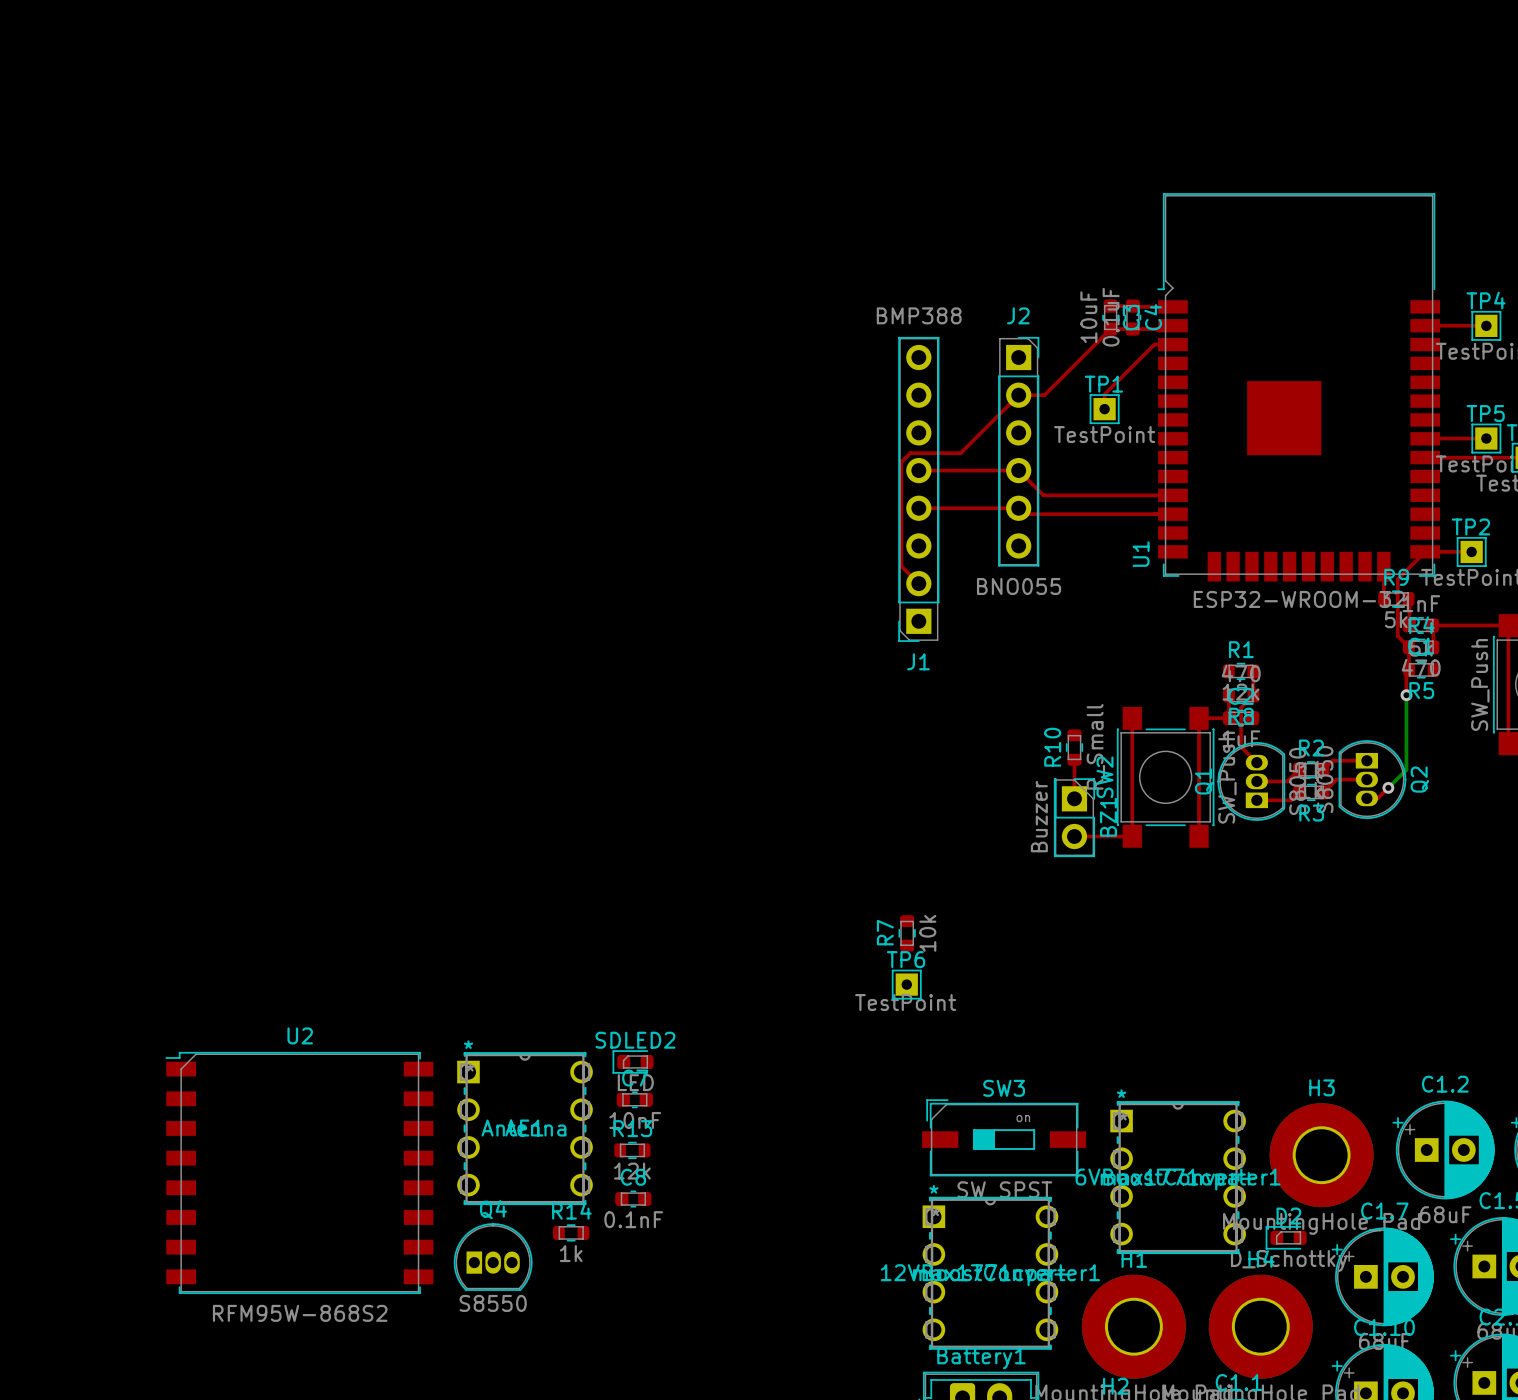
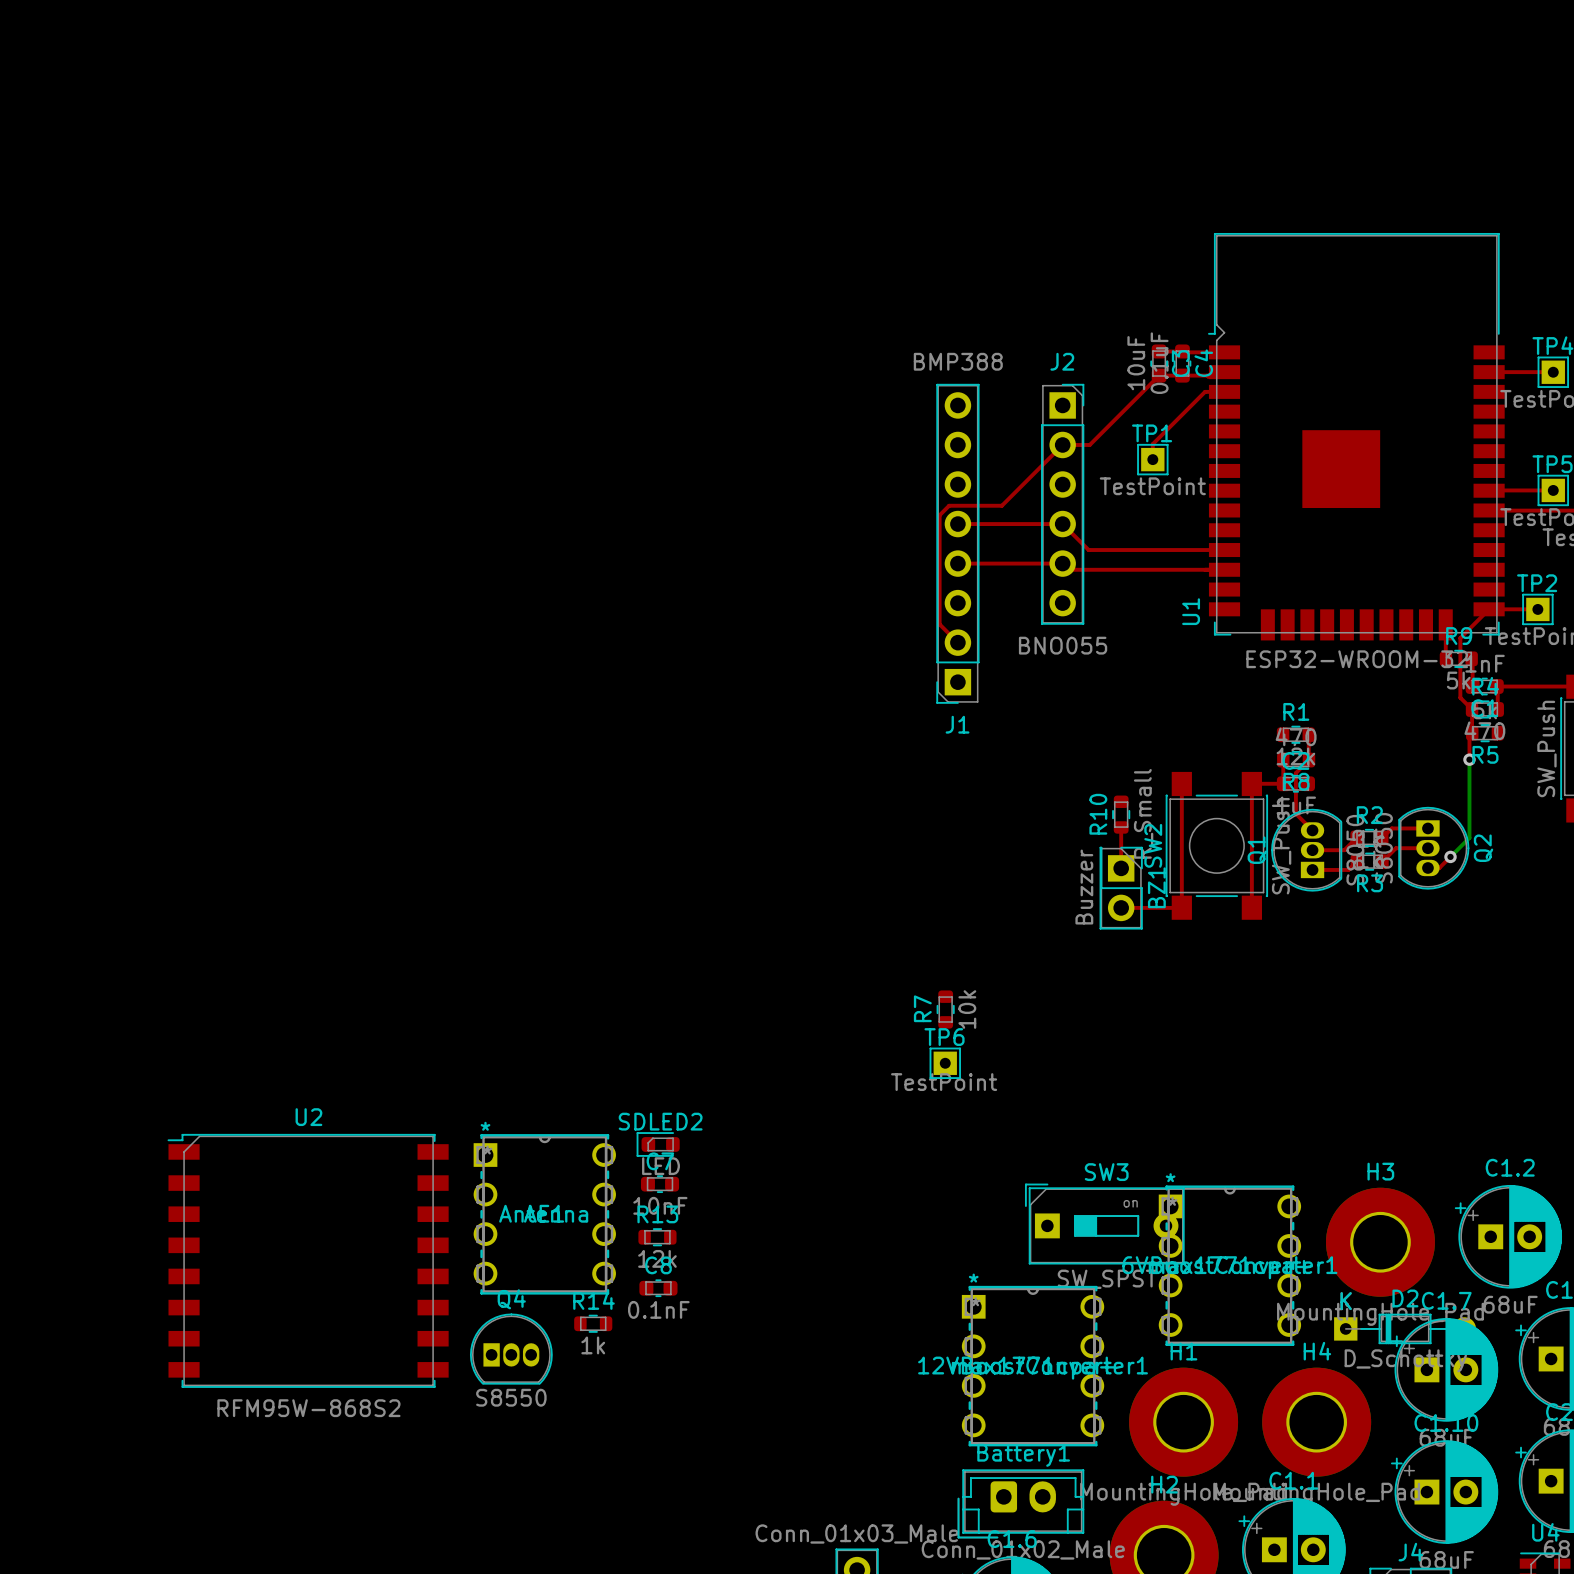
SW3 footprint: [922, 1099, 1087, 1177] -> [1024, 1183, 1185, 1265]
D2 footprint: [1265, 1226, 1307, 1250] -> [1334, 1313, 1477, 1345]

